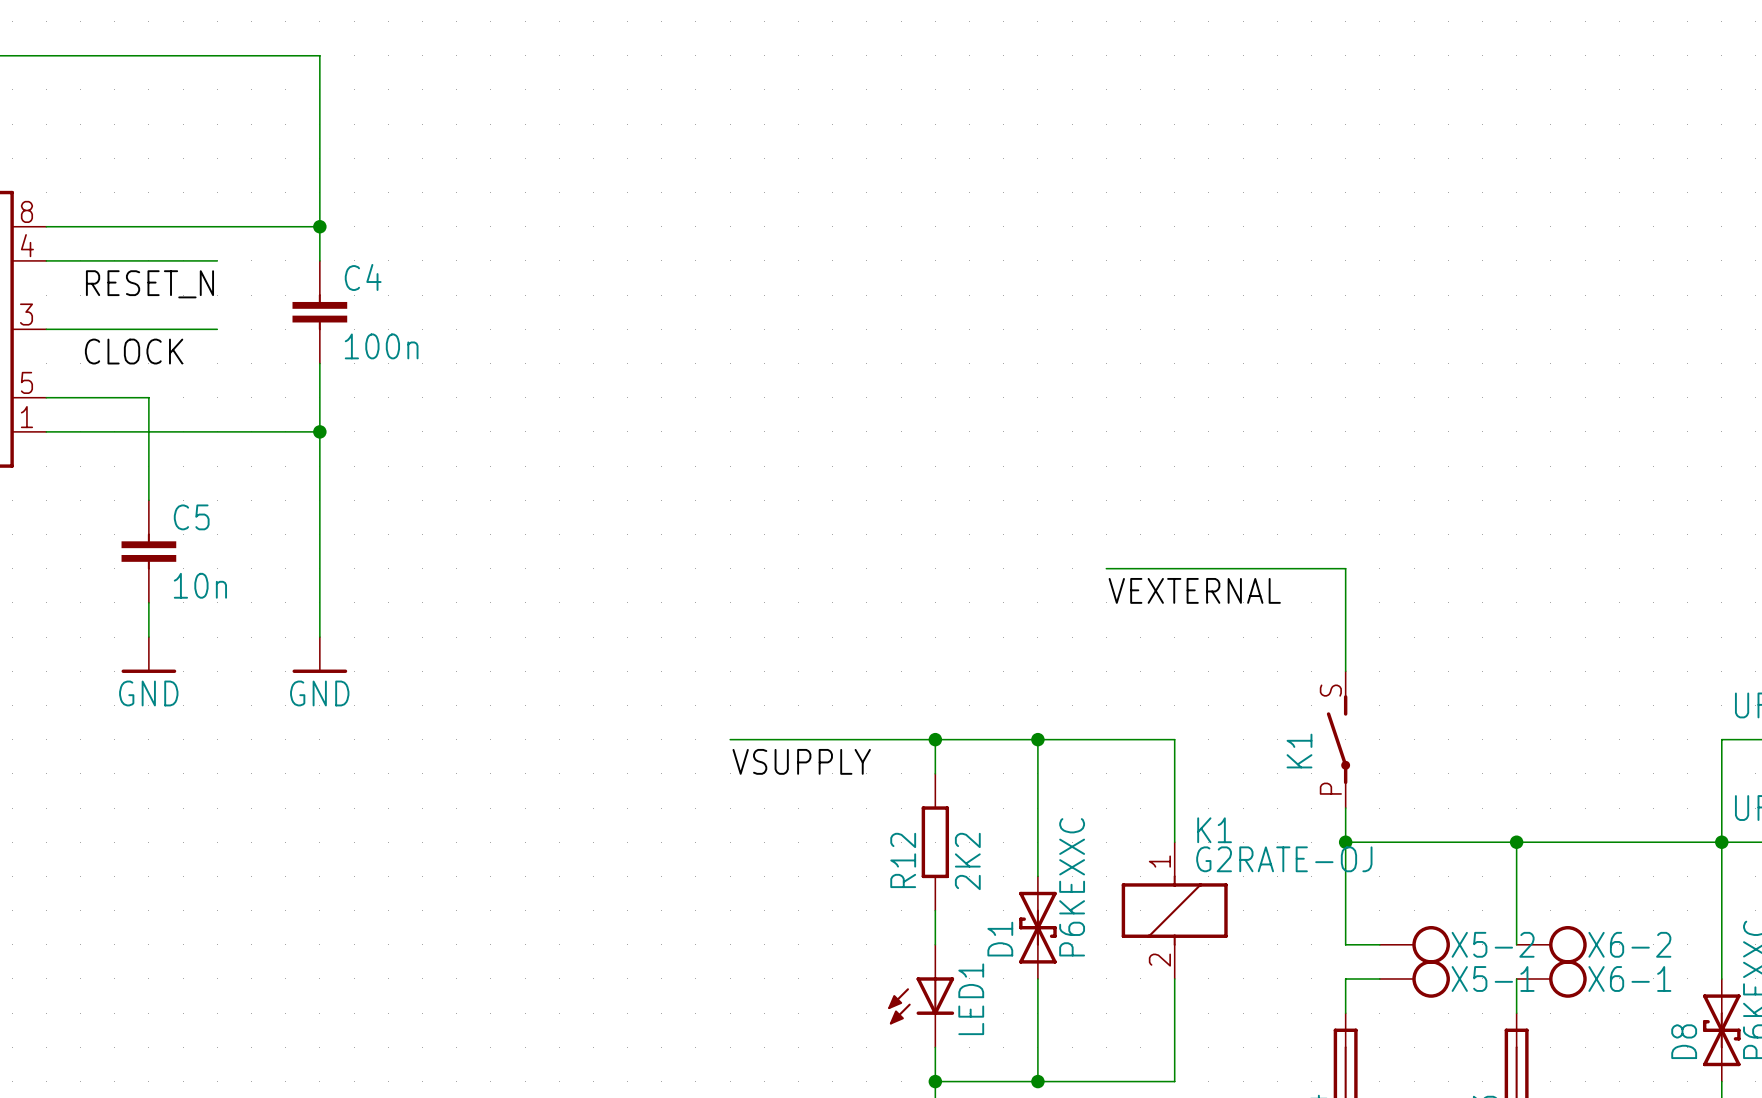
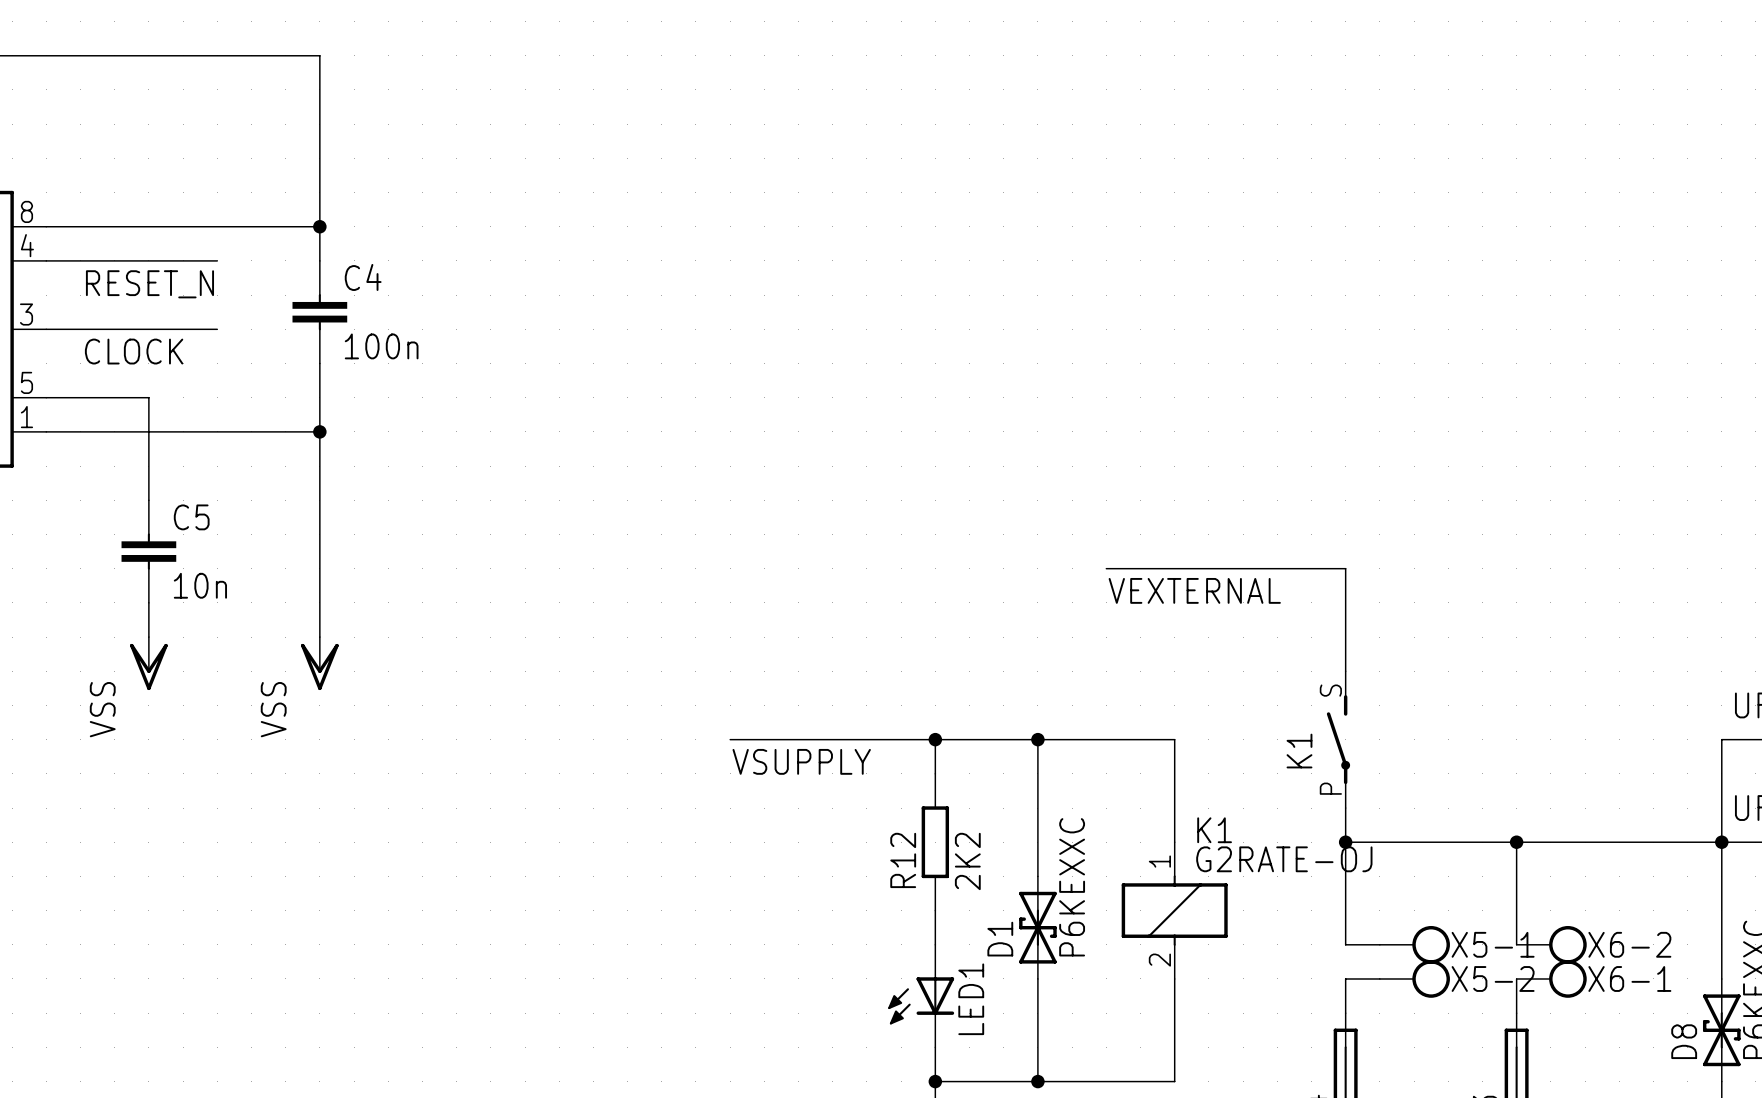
power symbol: GND (148, 655) -> VSS (148, 663)
power symbol: GND (319, 655) -> VSS (319, 663)
X5-2 name: X5-2 (1493, 944) -> X5-1 (1493, 944)
X5-1 name: X5-1 (1493, 978) -> X5-2 (1493, 978)

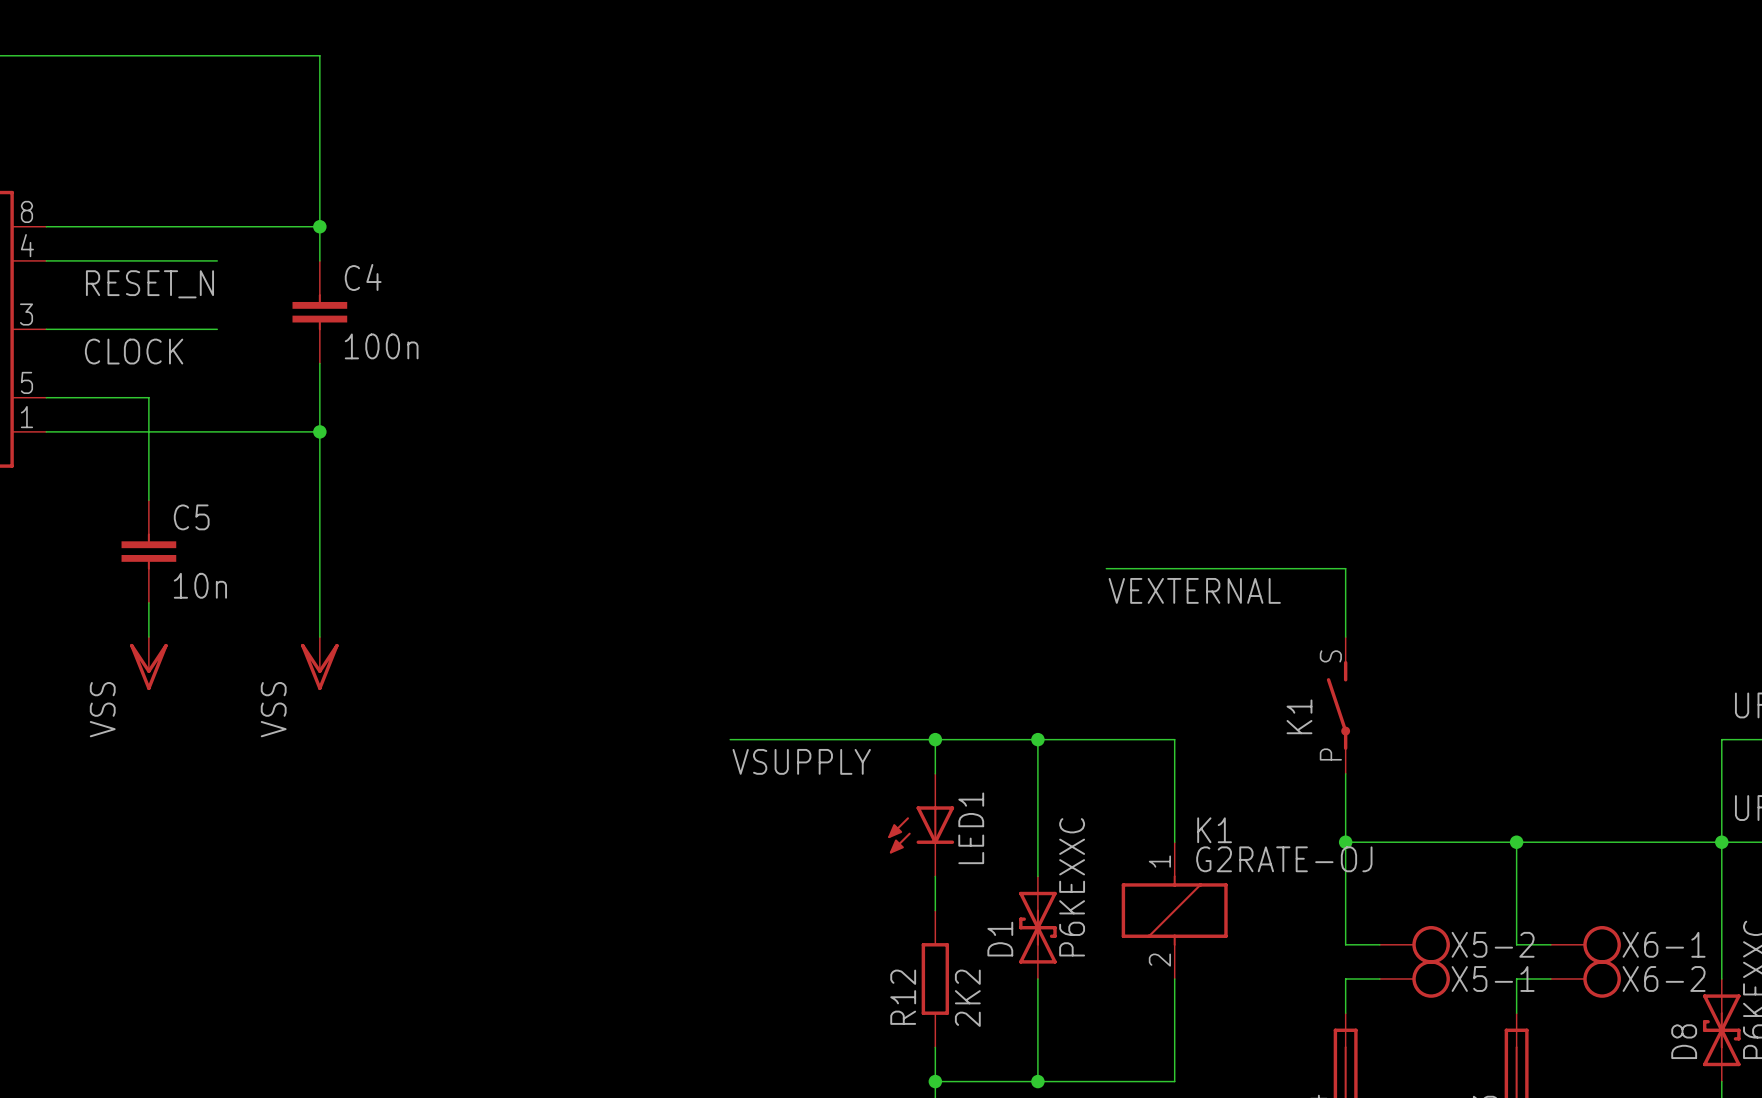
K1 position: (1338, 739) -> (1338, 705)
R12 position: (935, 842) -> (935, 978)
X5-1 name: X5-1 (1493, 944) -> X5-2 (1493, 944)
X6-2 position: (1551, 944) -> (1585, 978)
X5-2 name: X5-2 (1493, 978) -> X5-1 (1493, 978)
X6-1 position: (1551, 978) -> (1585, 944)
LED1 position: (921, 996) -> (921, 825)

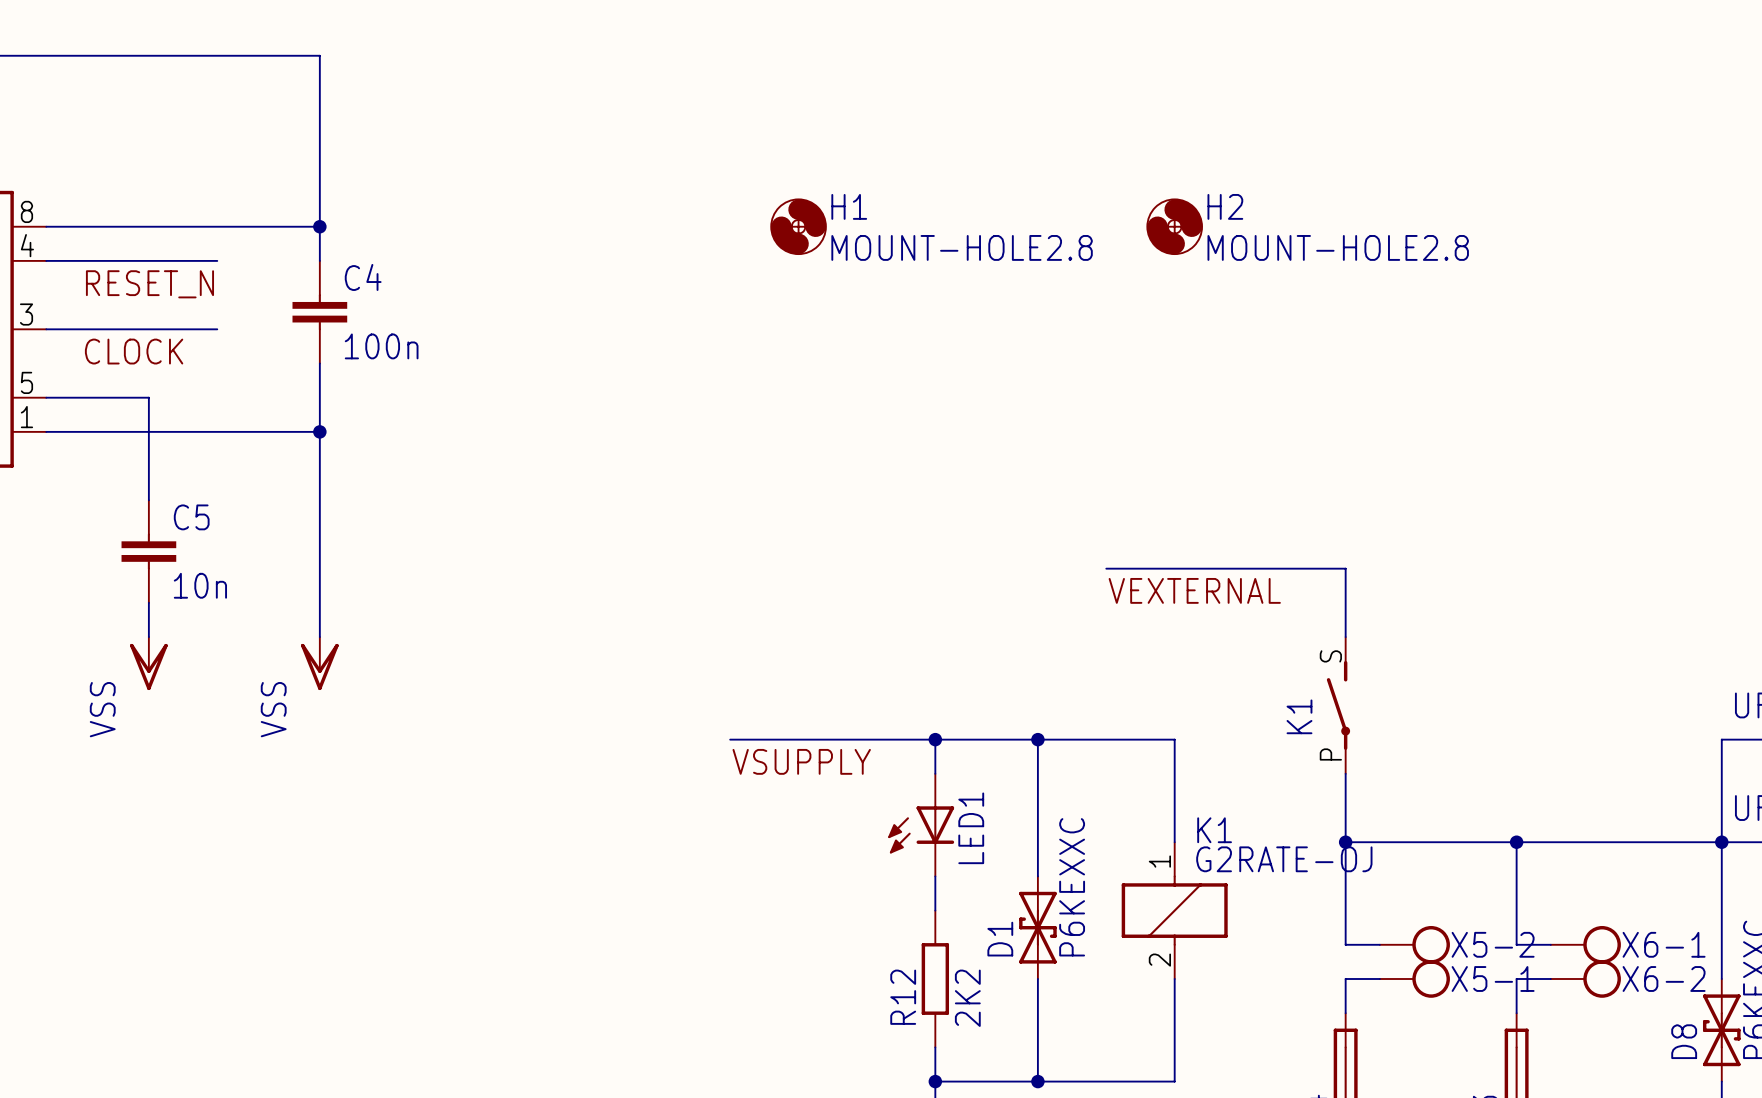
H1: none -> MOUNT-HOLE2.8 (798, 226)
H2: none -> MOUNT-HOLE2.8 (1174, 226)

